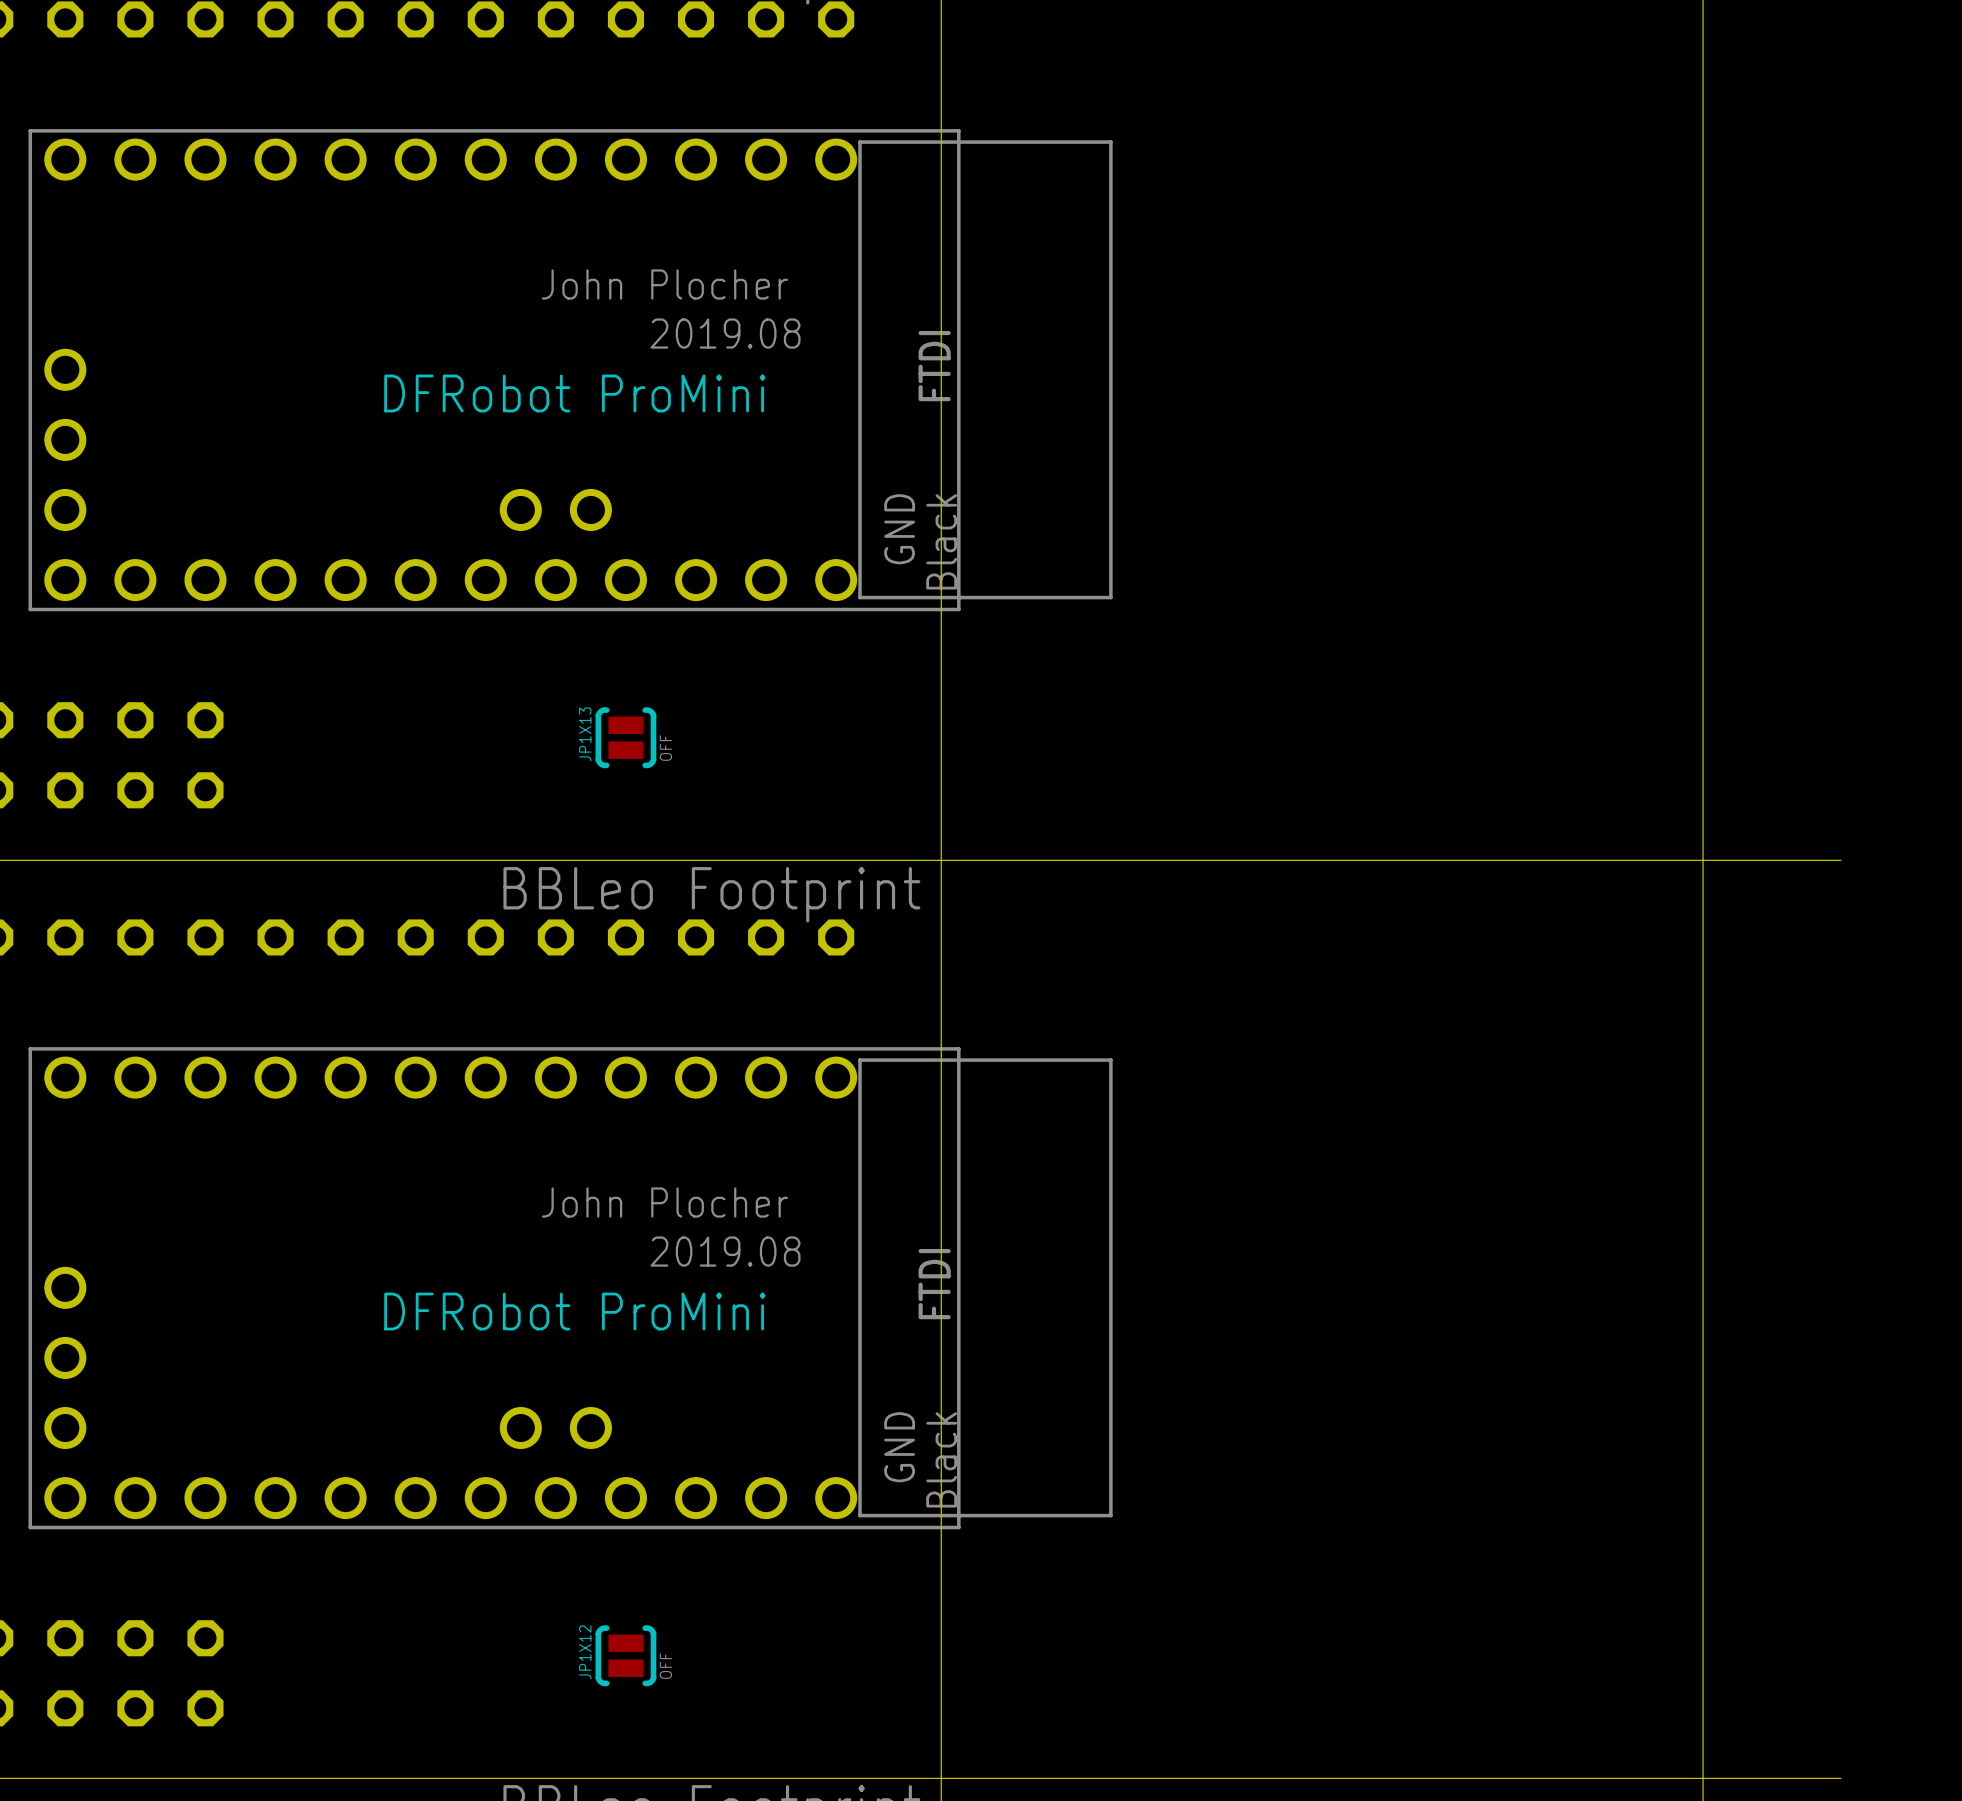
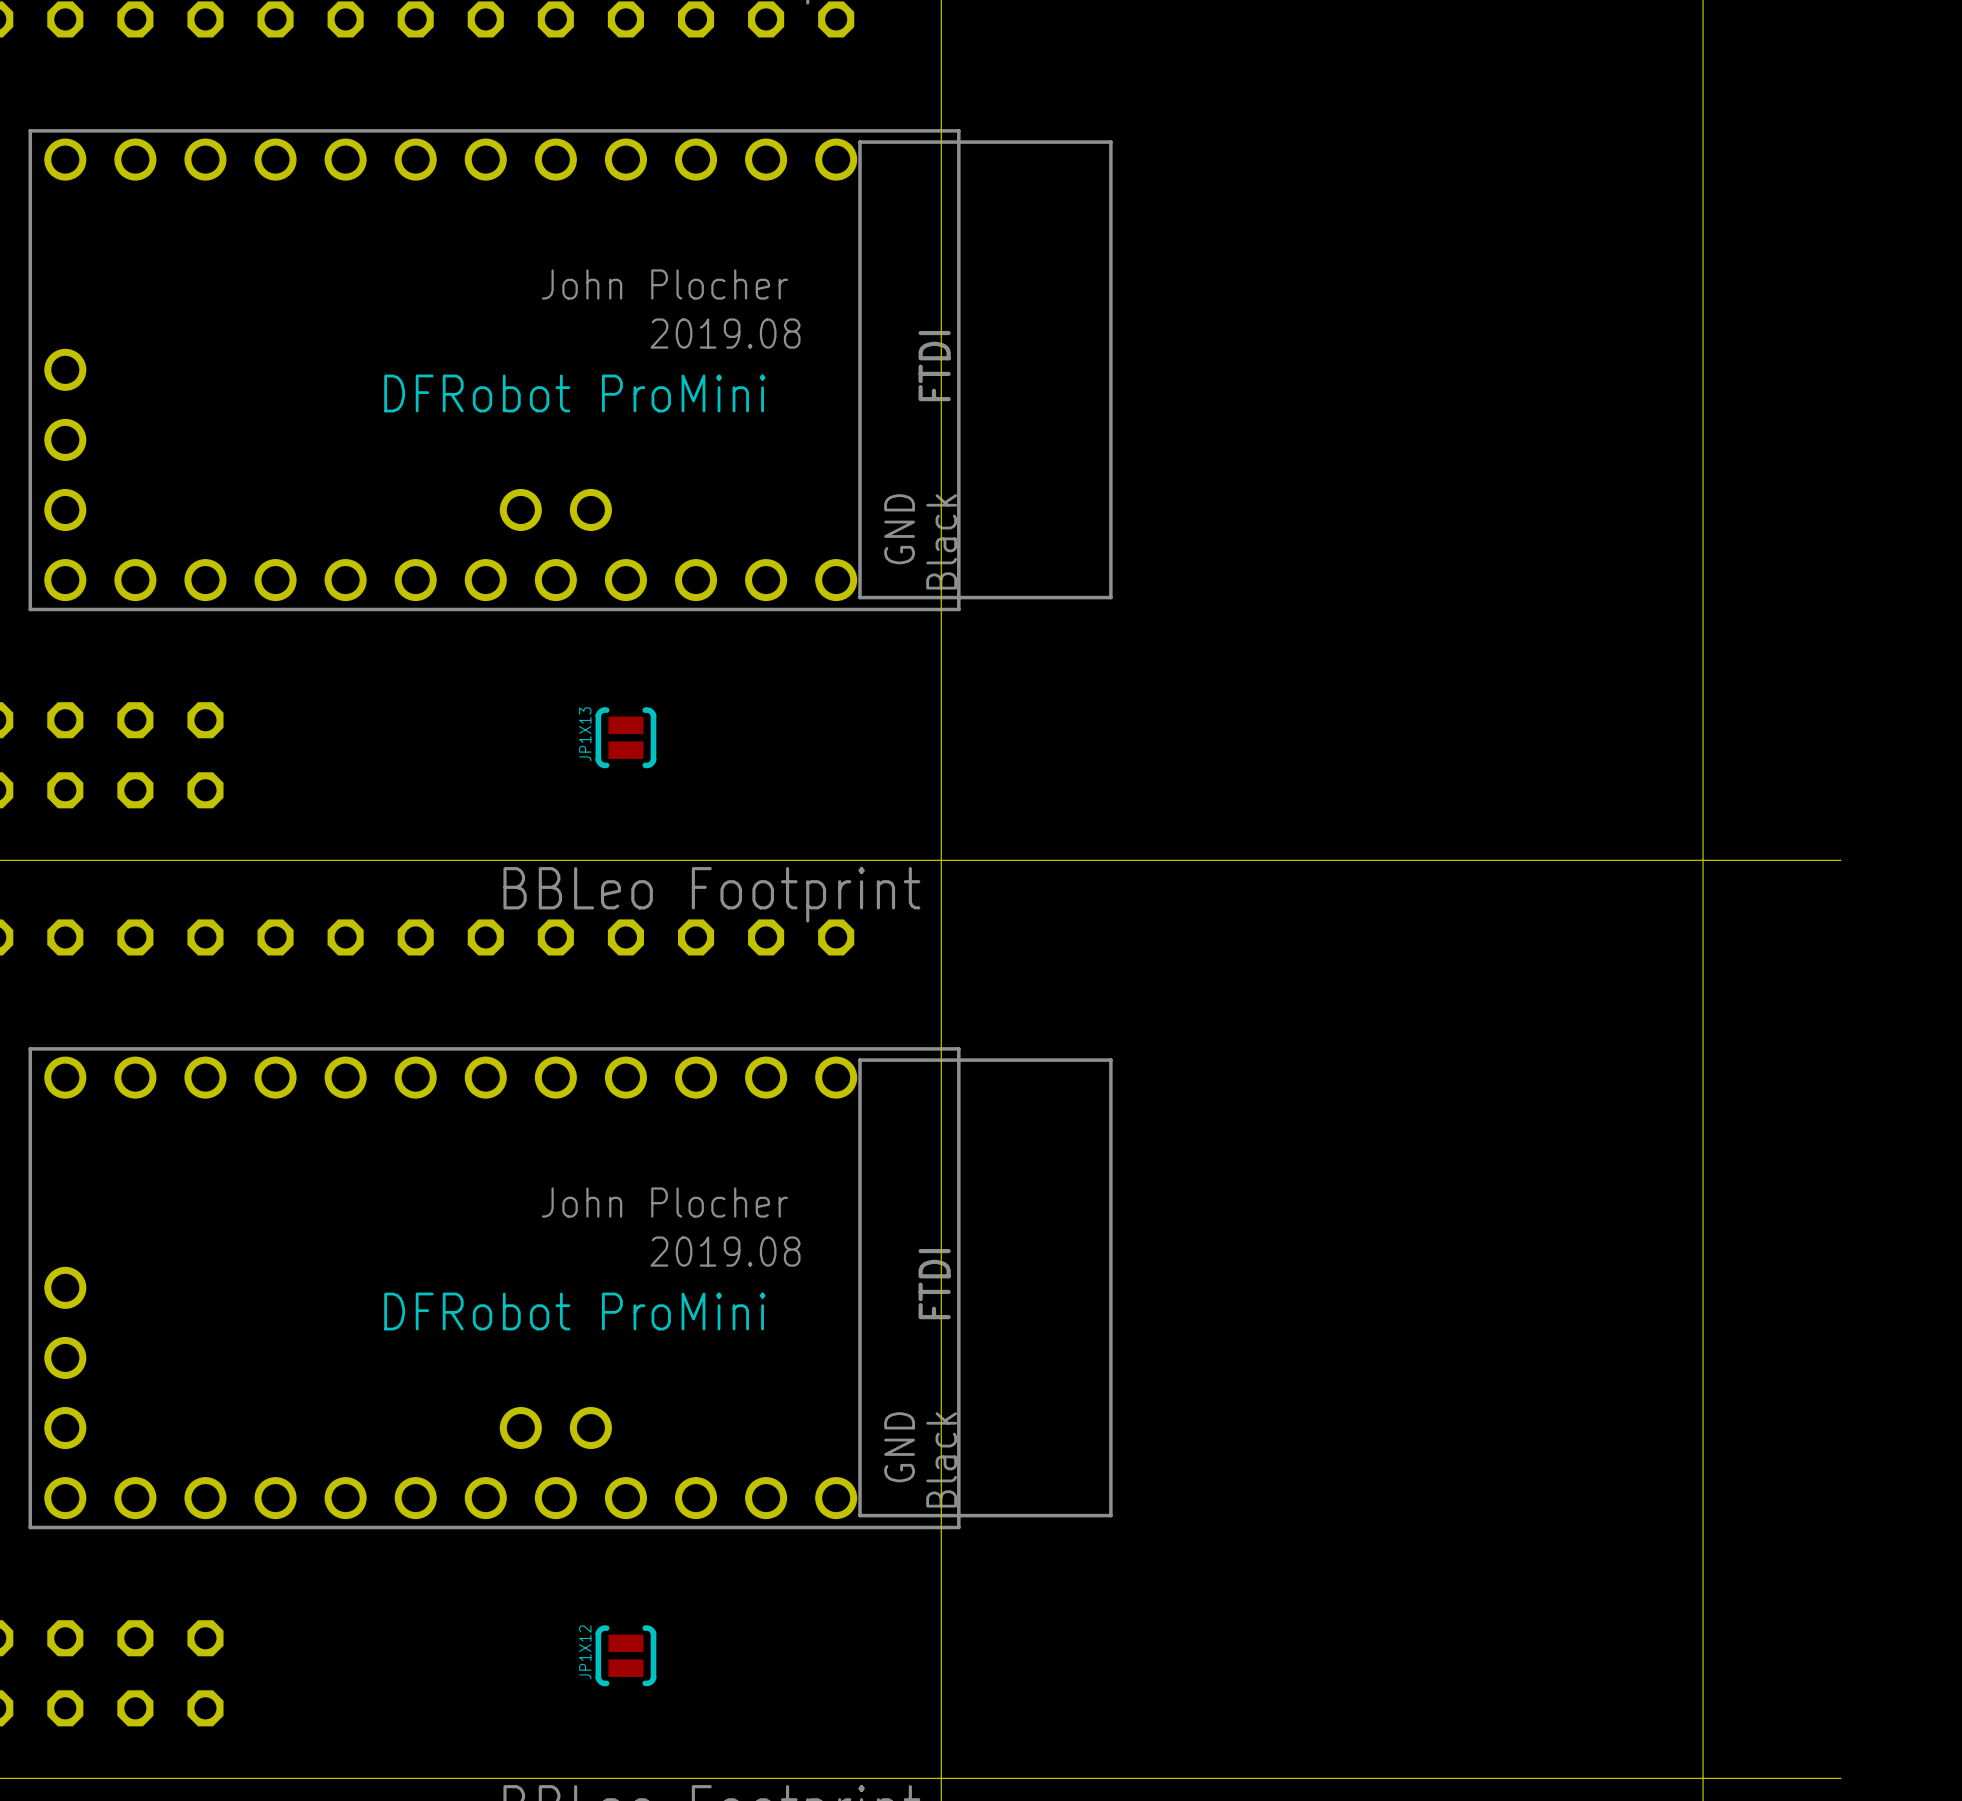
JP1X13 value: OFF (665, 748) -> none
JP1X12 value: OFF (665, 1666) -> none

